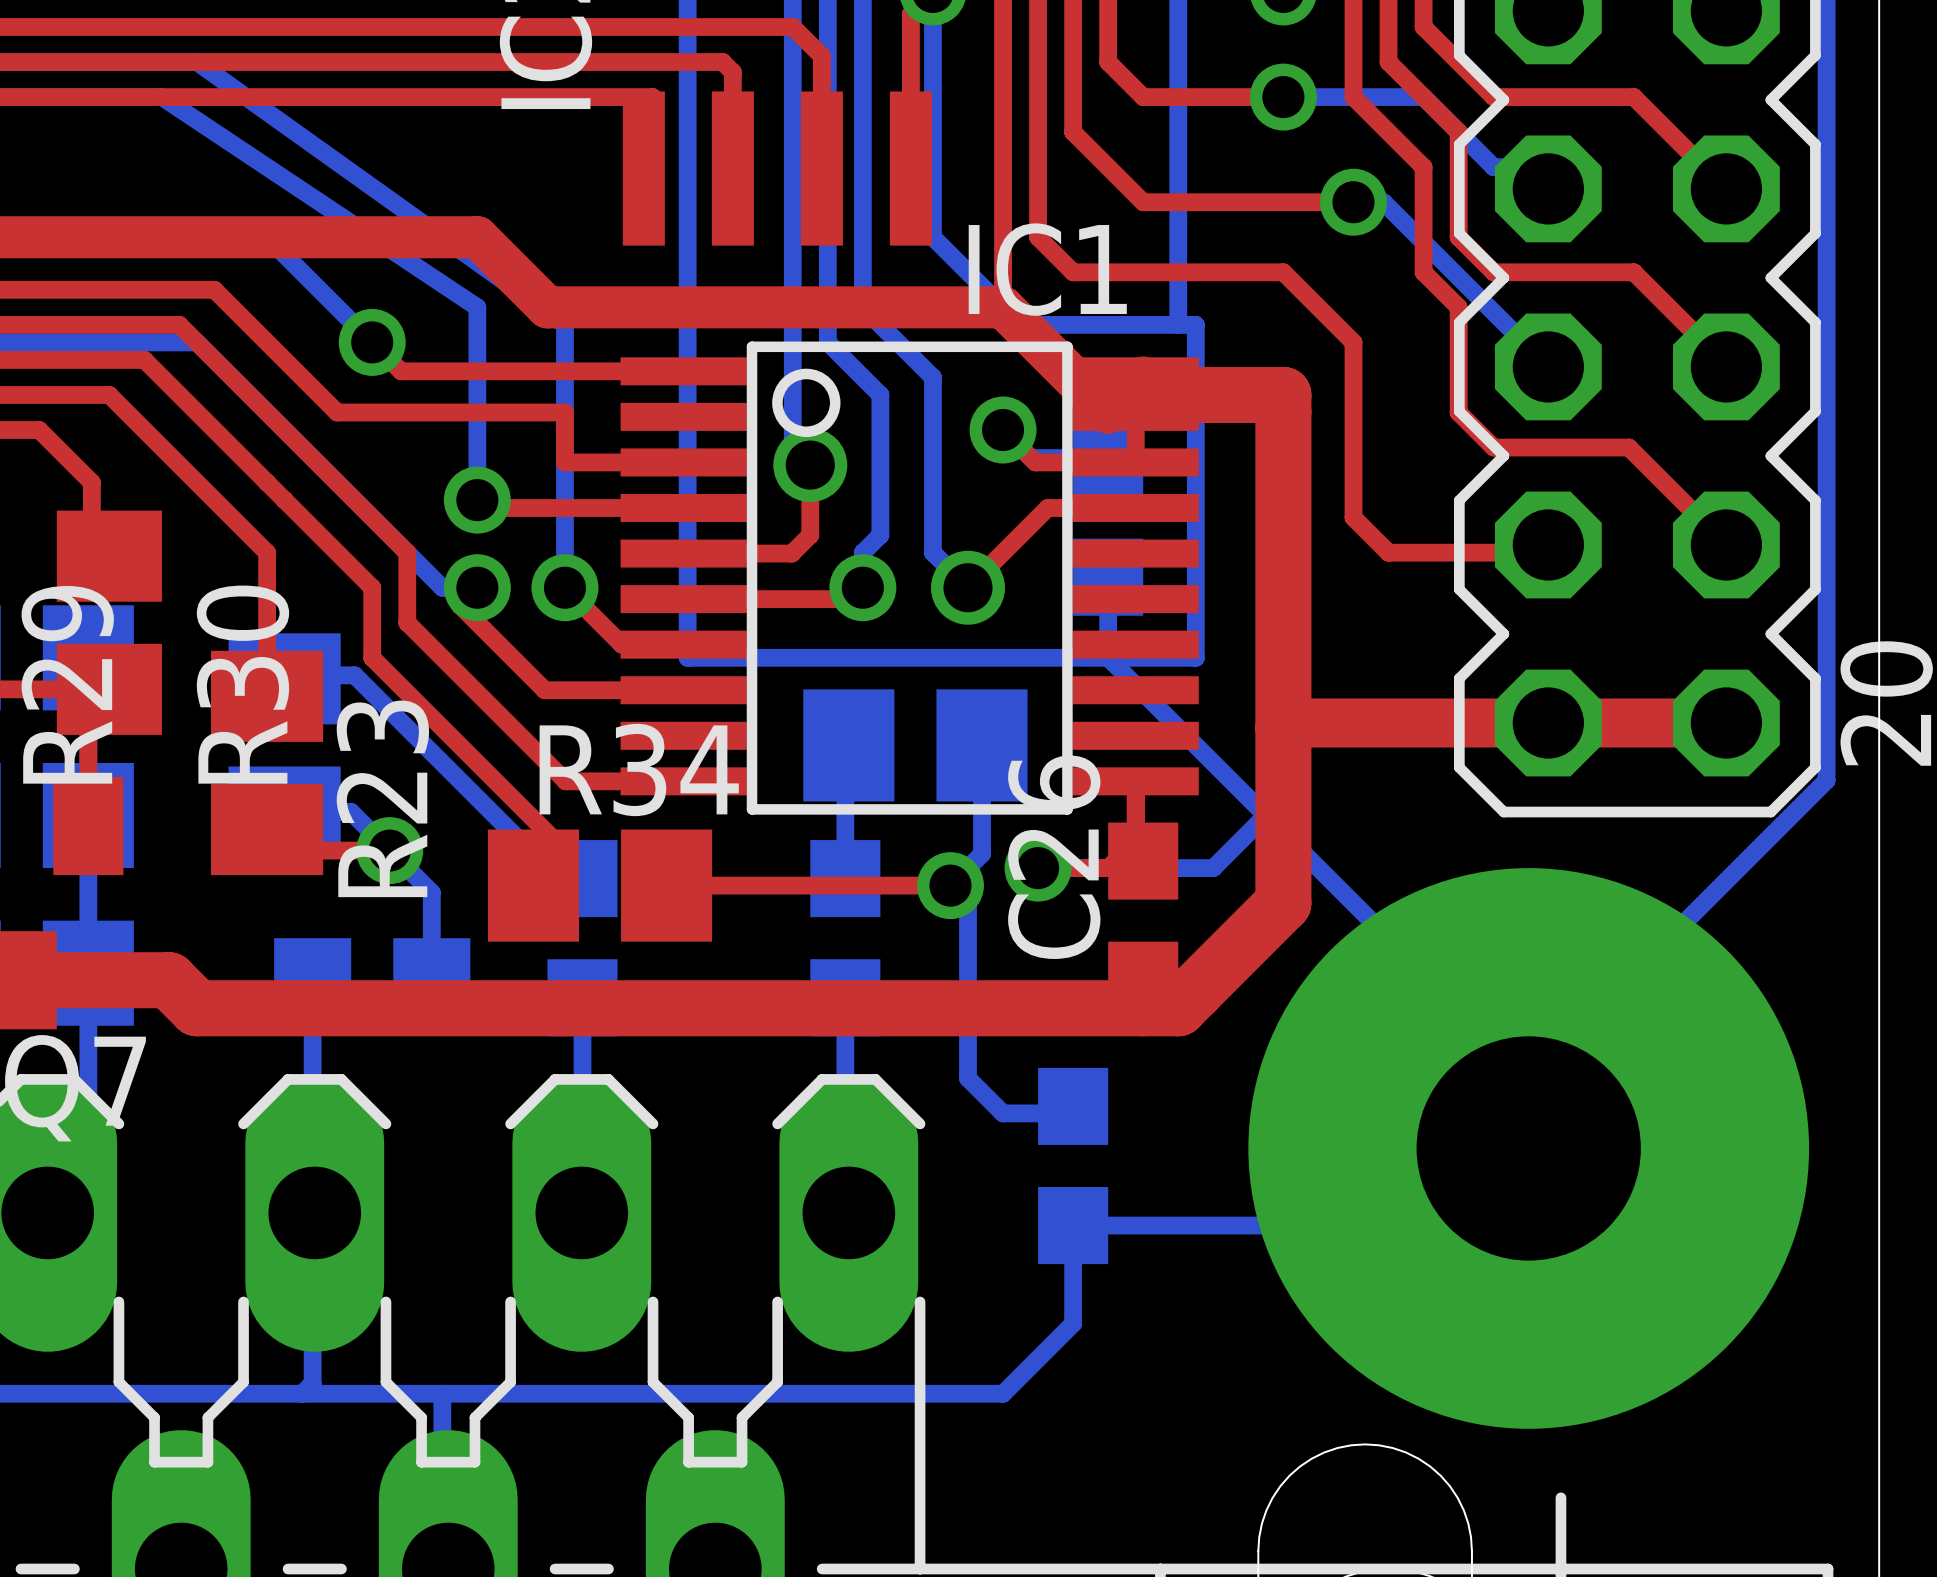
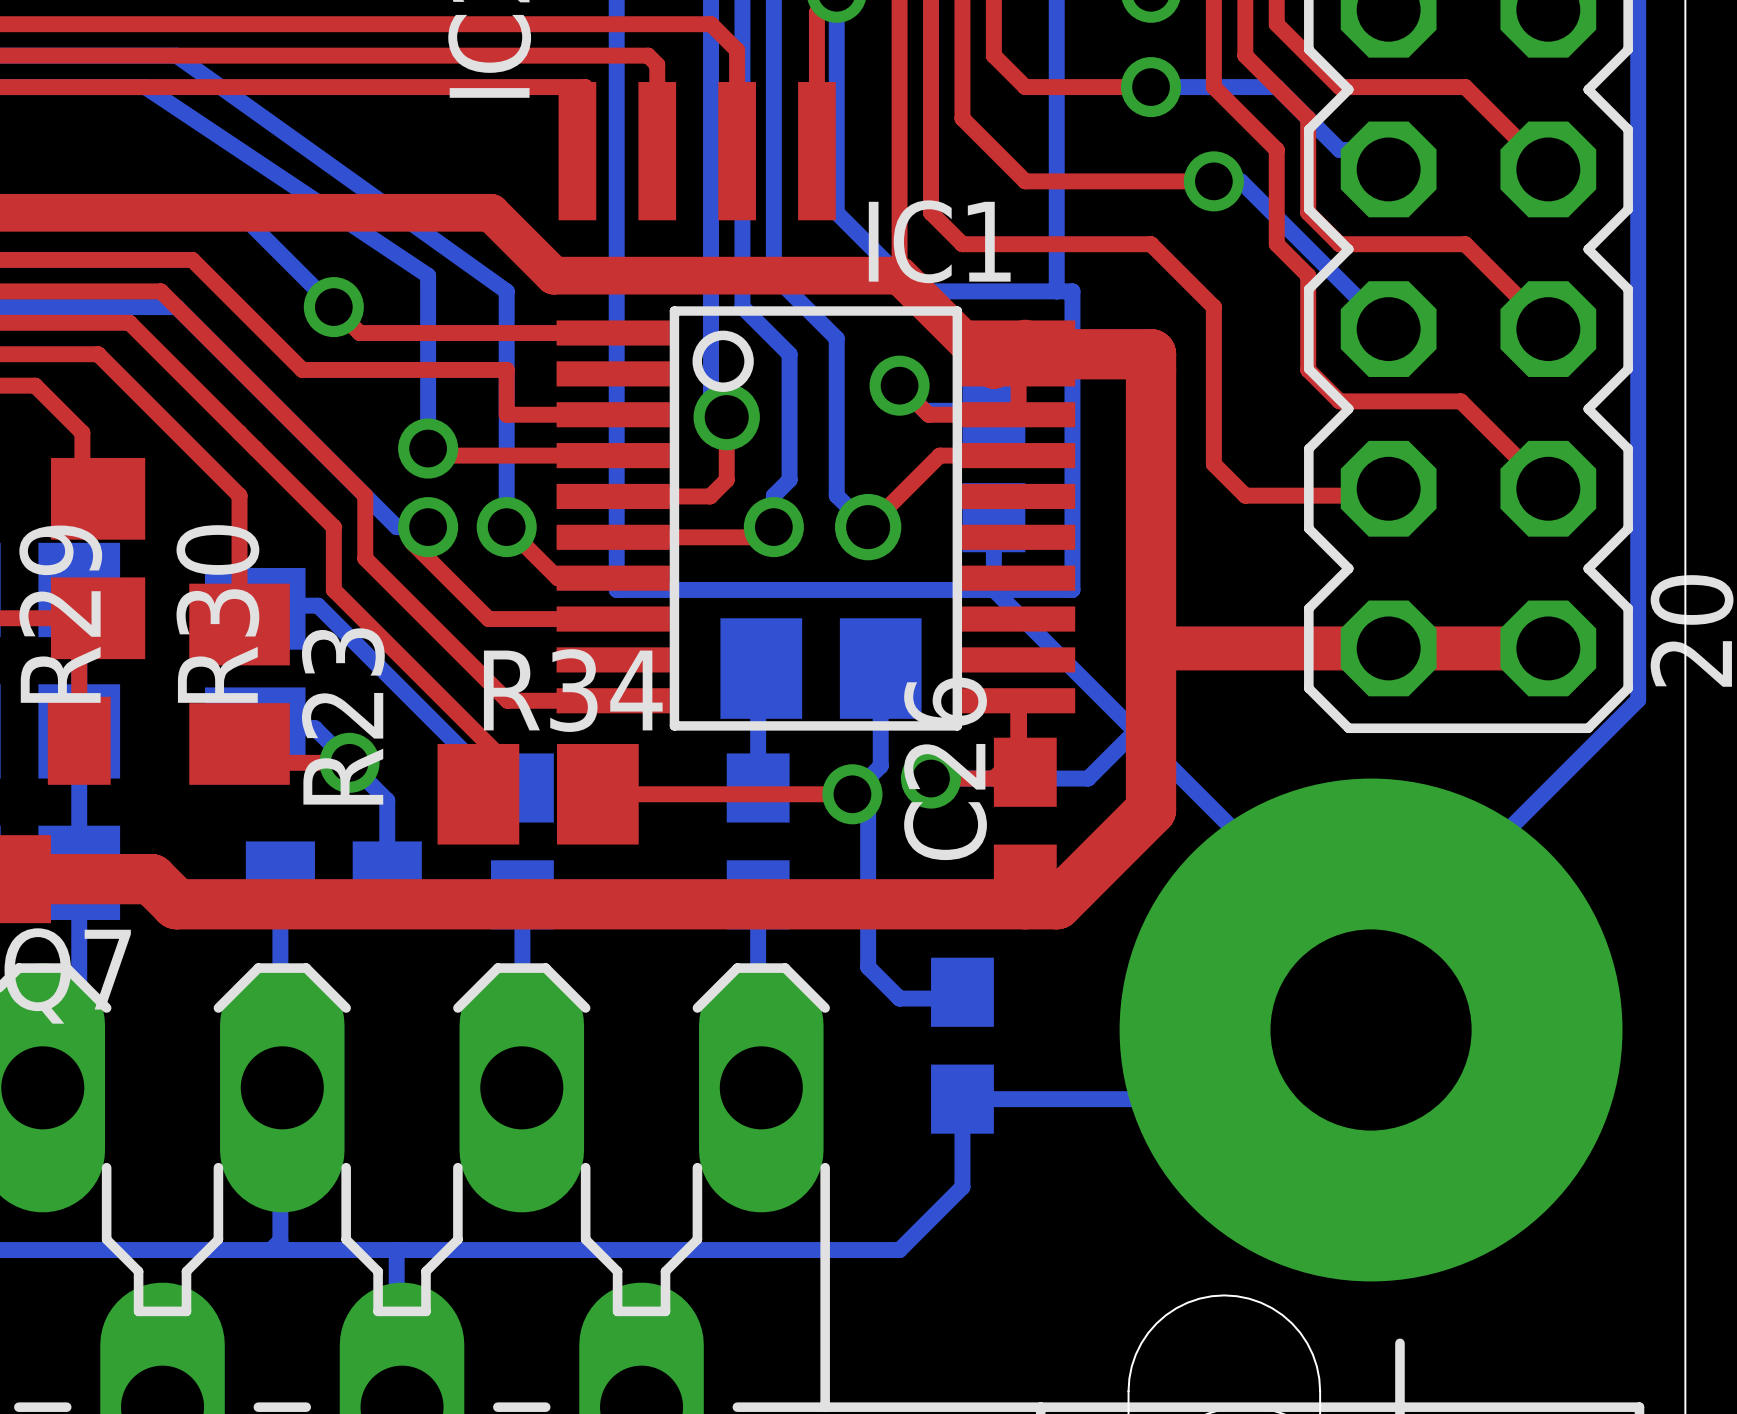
top track: (477, 237) (547, 307) (617, 307) -> (428, 212) (490, 212) (553, 275)

